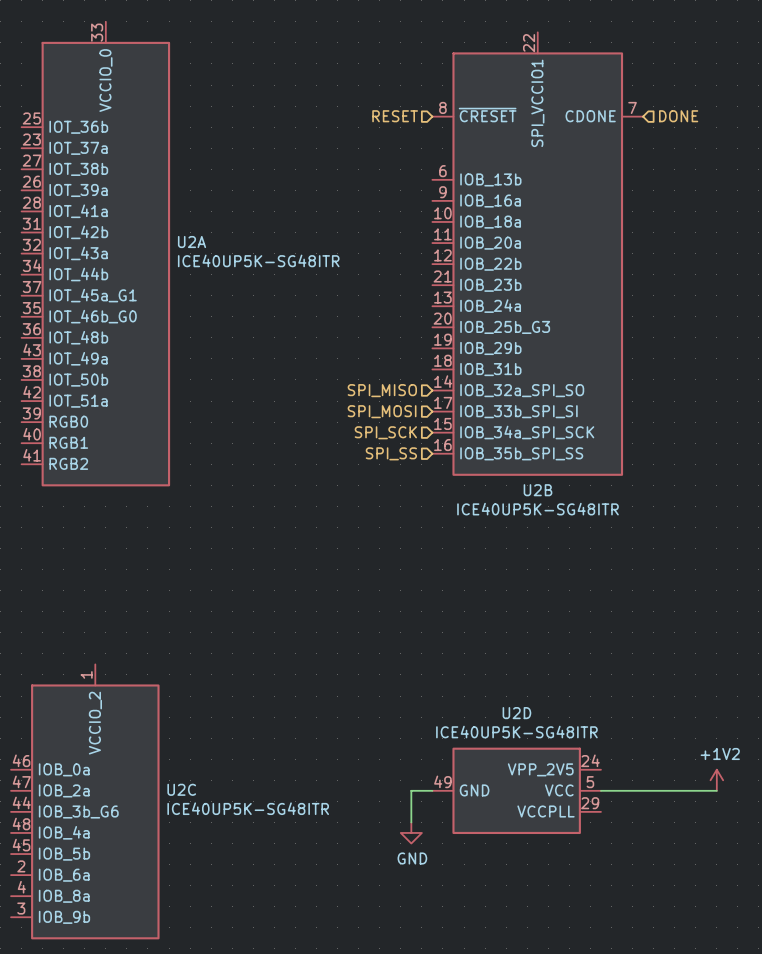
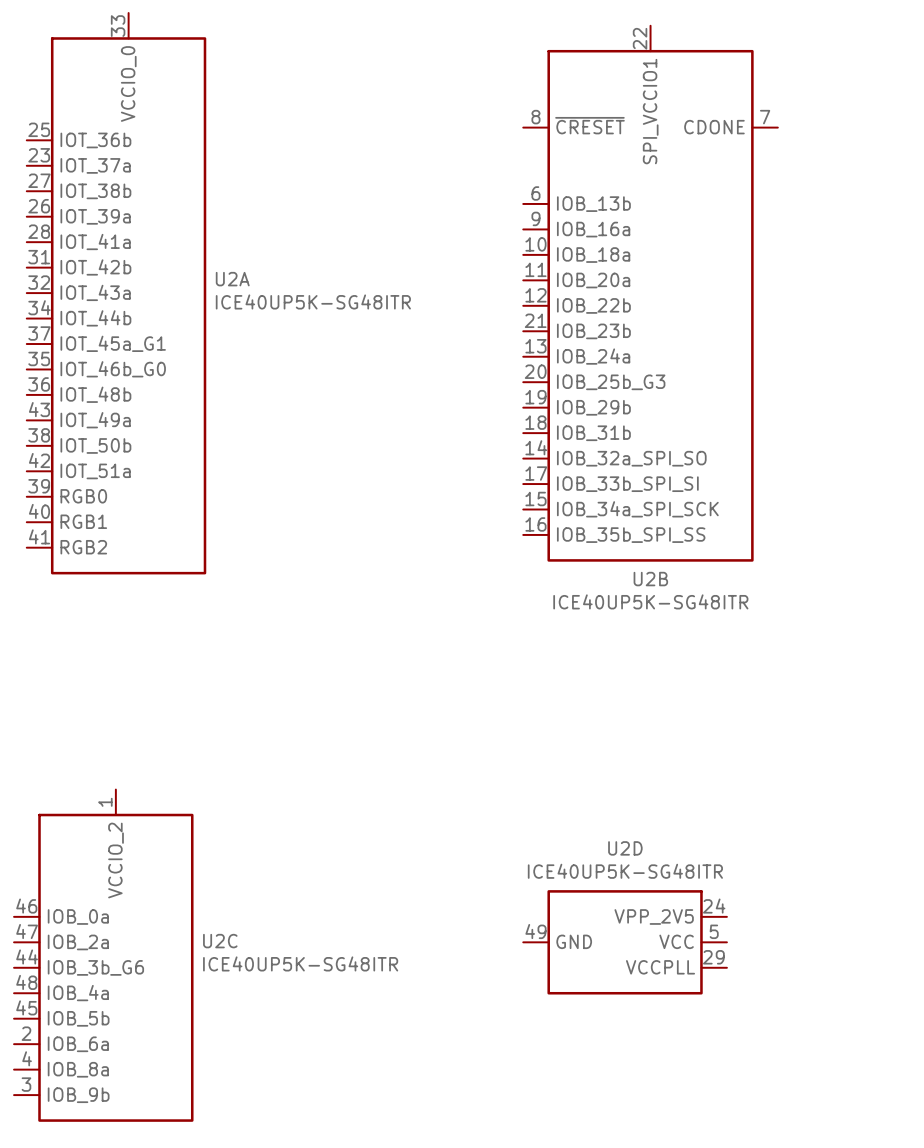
hierarchical label: RESET (395, 116) -> none
hierarchical label: DONE (678, 116) -> none
hierarchical label: SPI_MISO (382, 390) -> none
hierarchical label: SPI_MOSI (382, 411) -> none
hierarchical label: SPI_SCK (385, 432) -> none
hierarchical label: SPI_SS (391, 453) -> none
power symbol: +1V2 (716, 780) -> none
wire: (432, 790) (411, 790) (411, 822) -> none
wire: (600, 790) (716, 790) -> none
power symbol: GND (411, 832) -> none

